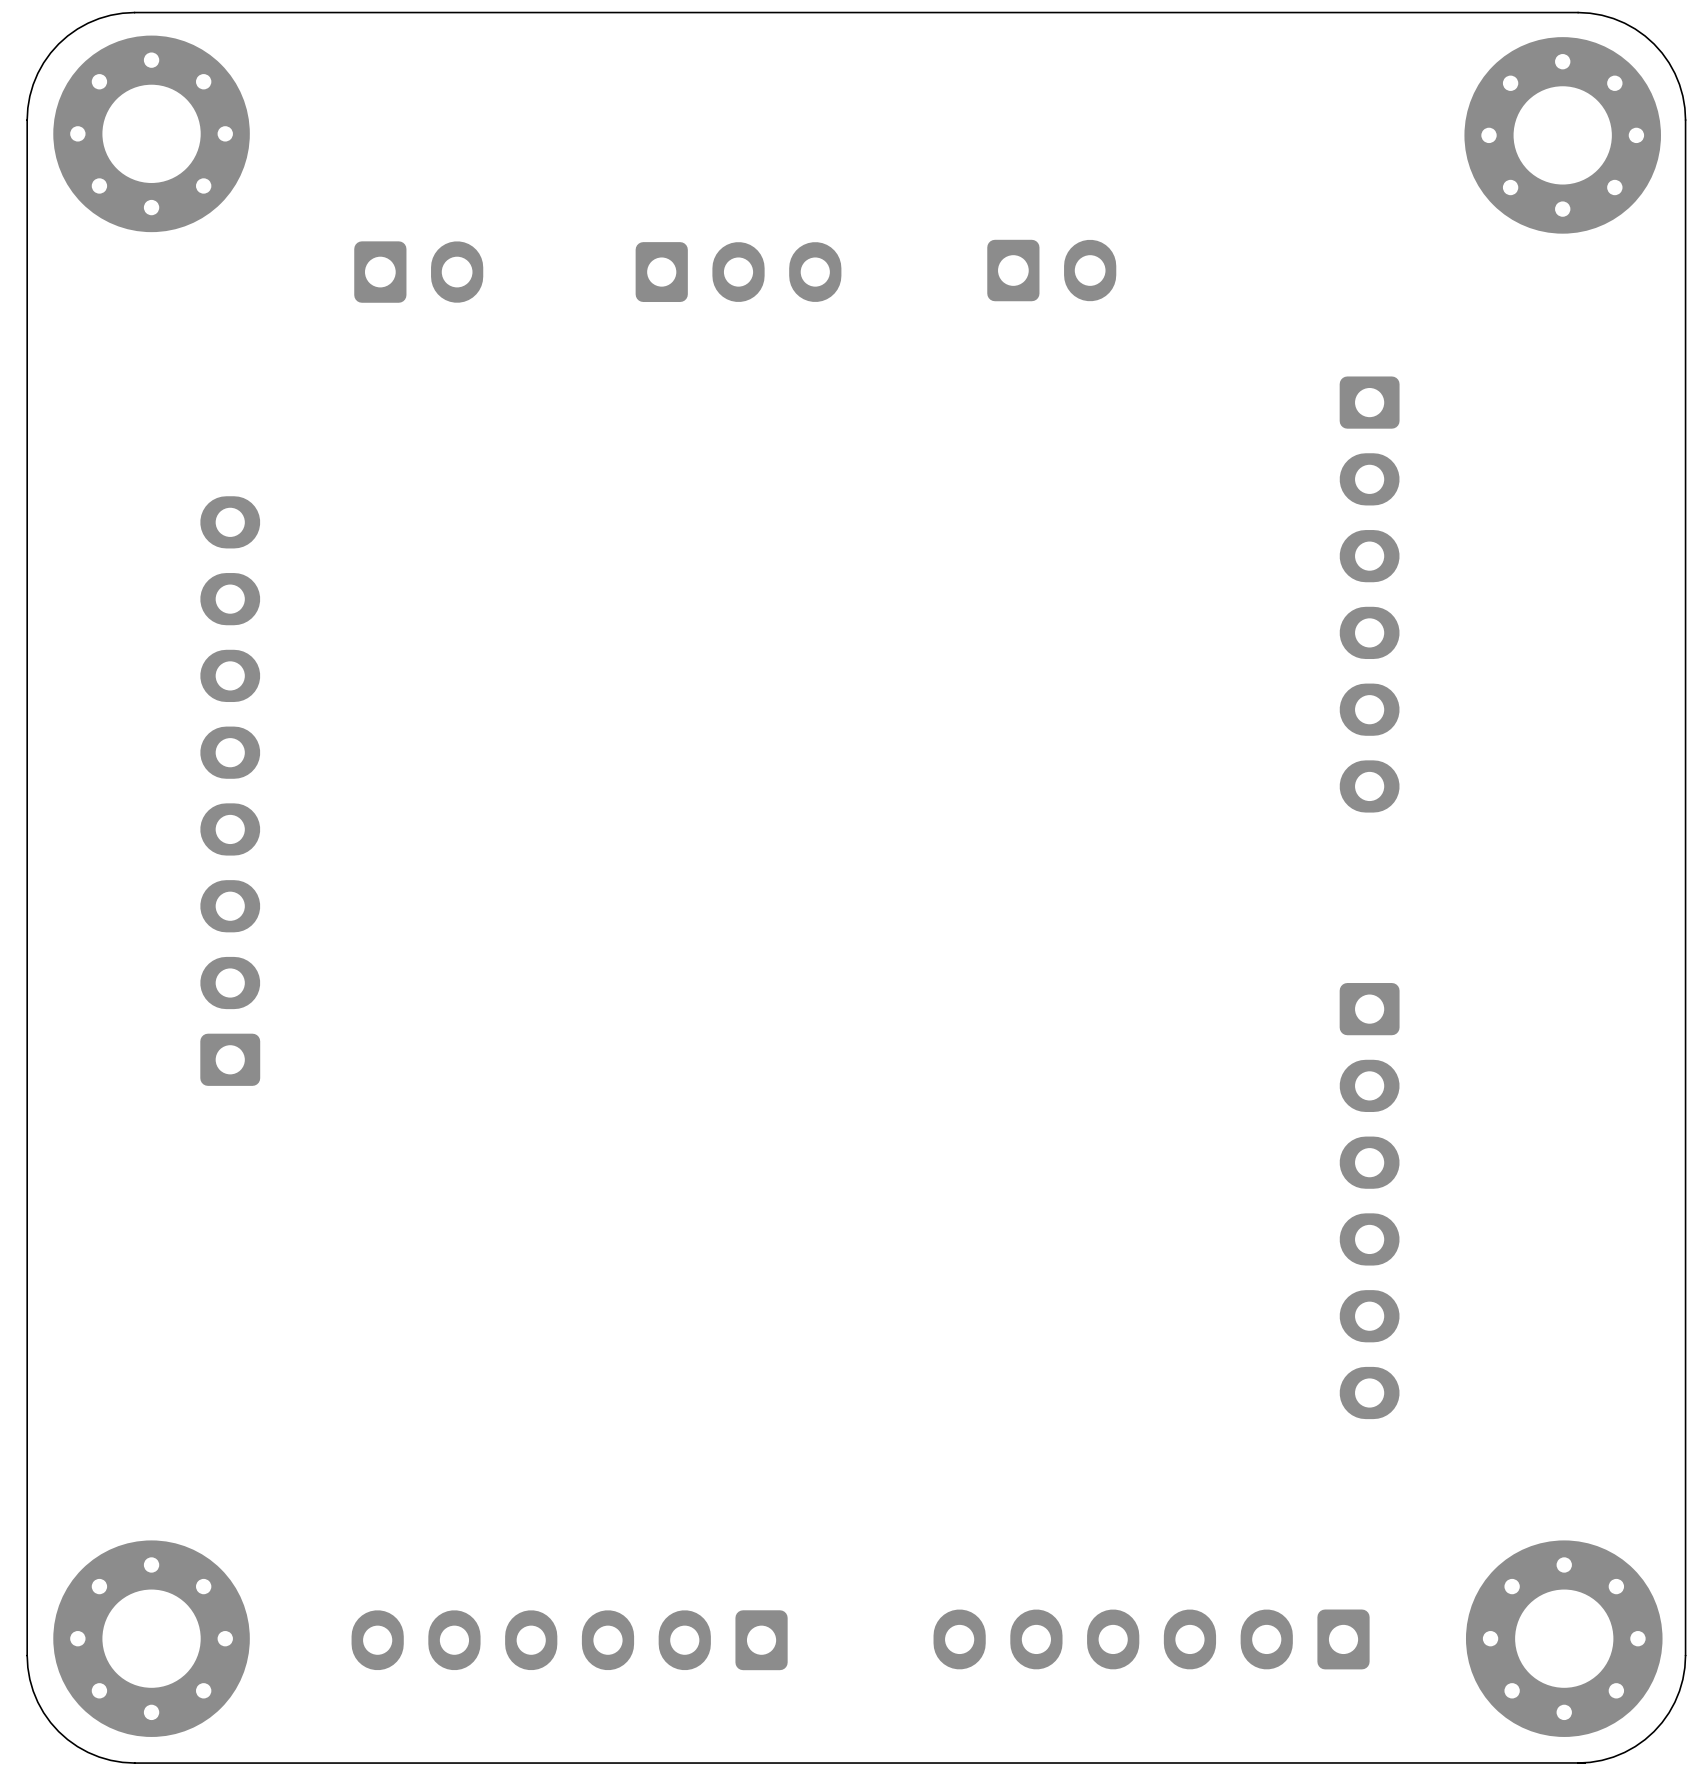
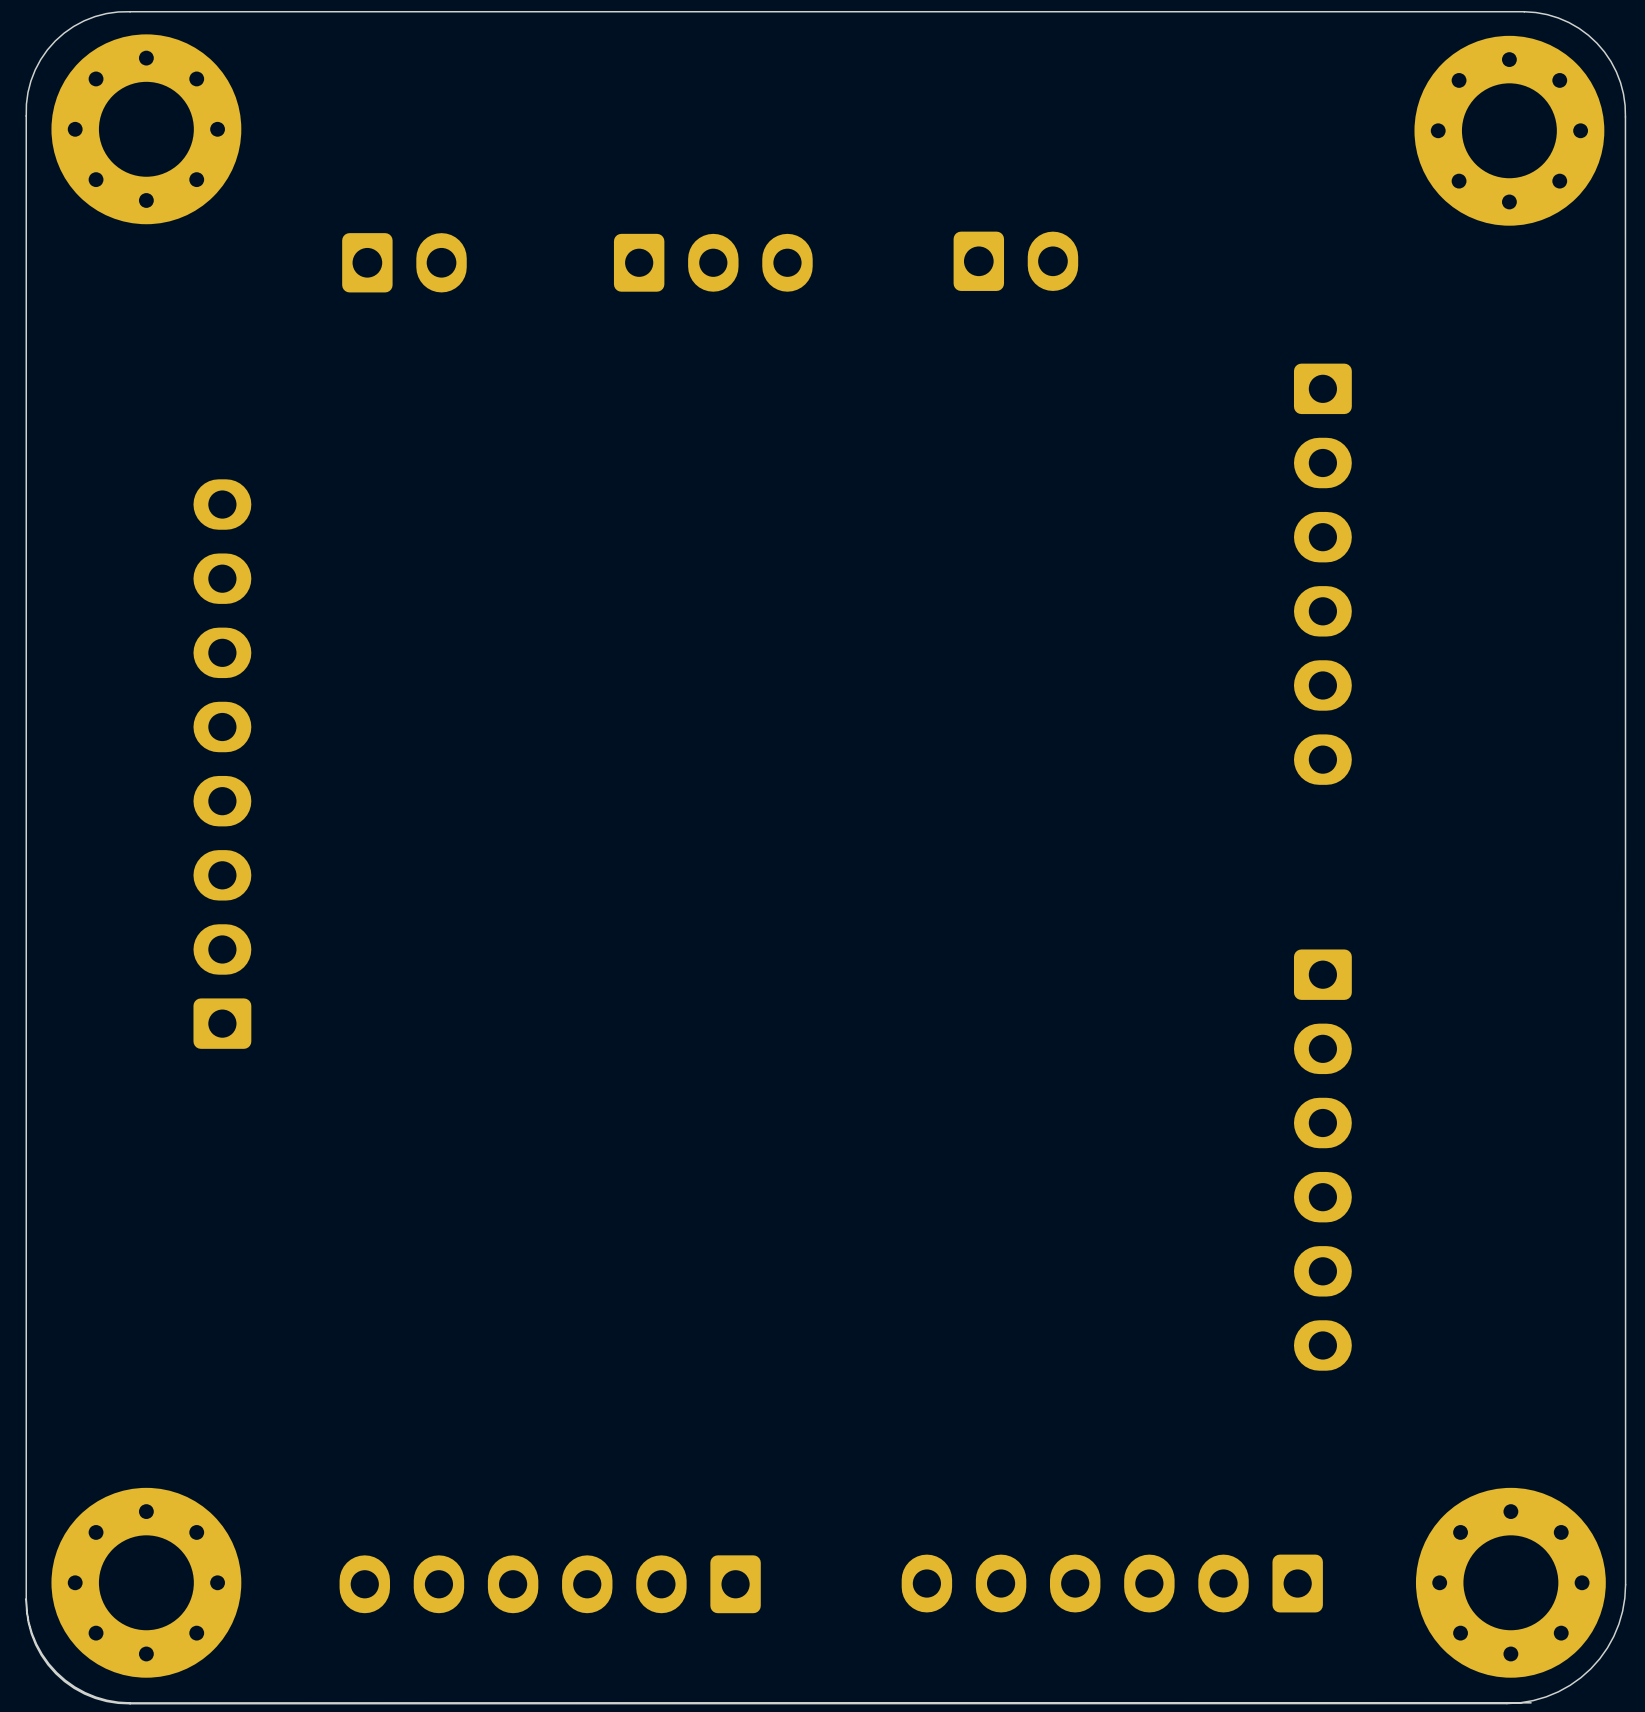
board edge: (27, 120) (29, 96) (37, 73) (58, 44) (77, 29) (99, 18) (134, 12) (1578, 12) (1601, 15) (1624, 23) (1654, 44) (1669, 62) (1679, 84) (1685, 120) (1685, 1655) (1679, 1691) (1669, 1712) (1654, 1731) (1624, 1752) (1601, 1760) (1578, 1763) -> (26, 115) (27, 92) (35, 69) (55, 41) (84, 20) (118, 11) (1524, 11) (1558, 17) (1588, 35) (1604, 51) (1616, 71) (1623, 93) (1625, 116) (1625, 1584) (1618, 1624) (1607, 1648) (1590, 1668) (1558, 1691) (1533, 1700) (1506, 1703) (118, 1703) (84, 1693) (55, 1673) (35, 1644) (28, 1622) (26, 1599)

